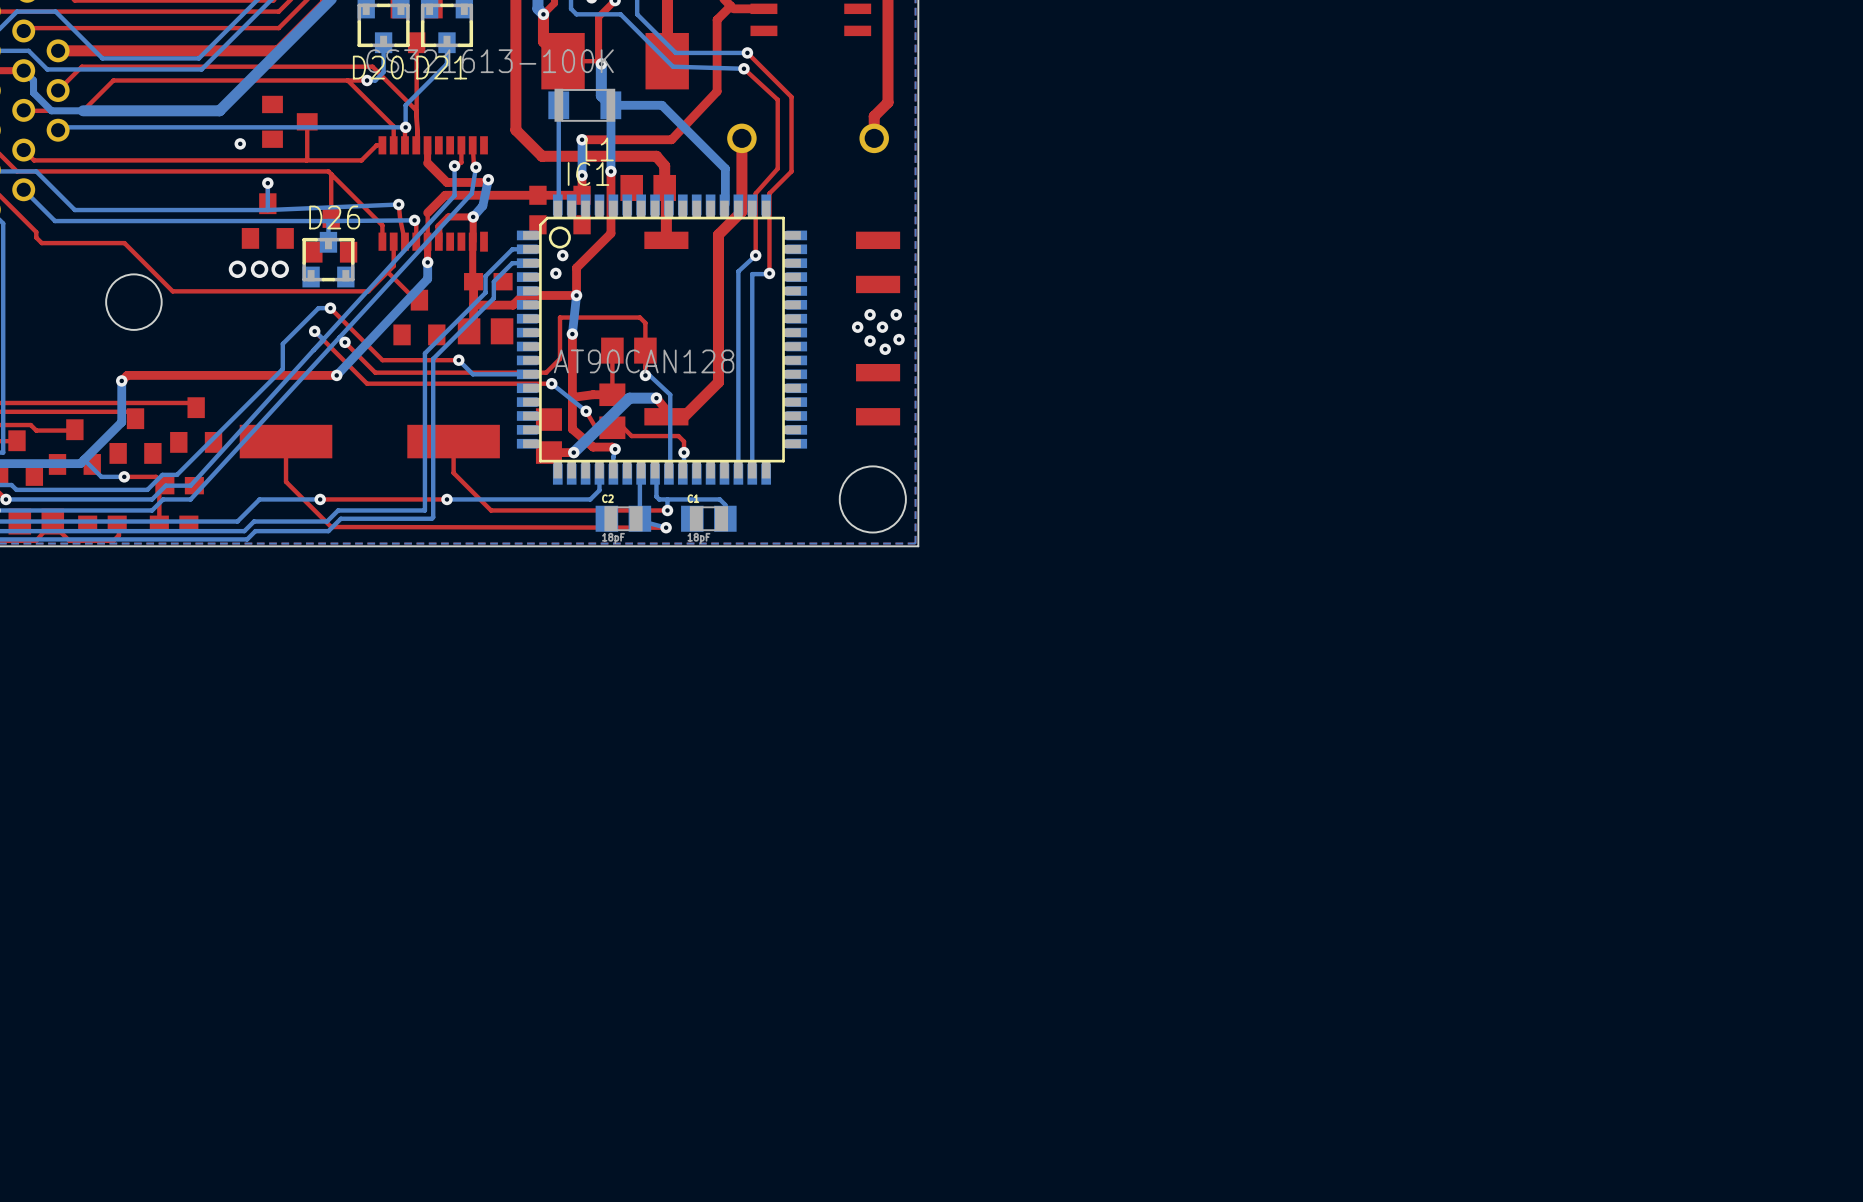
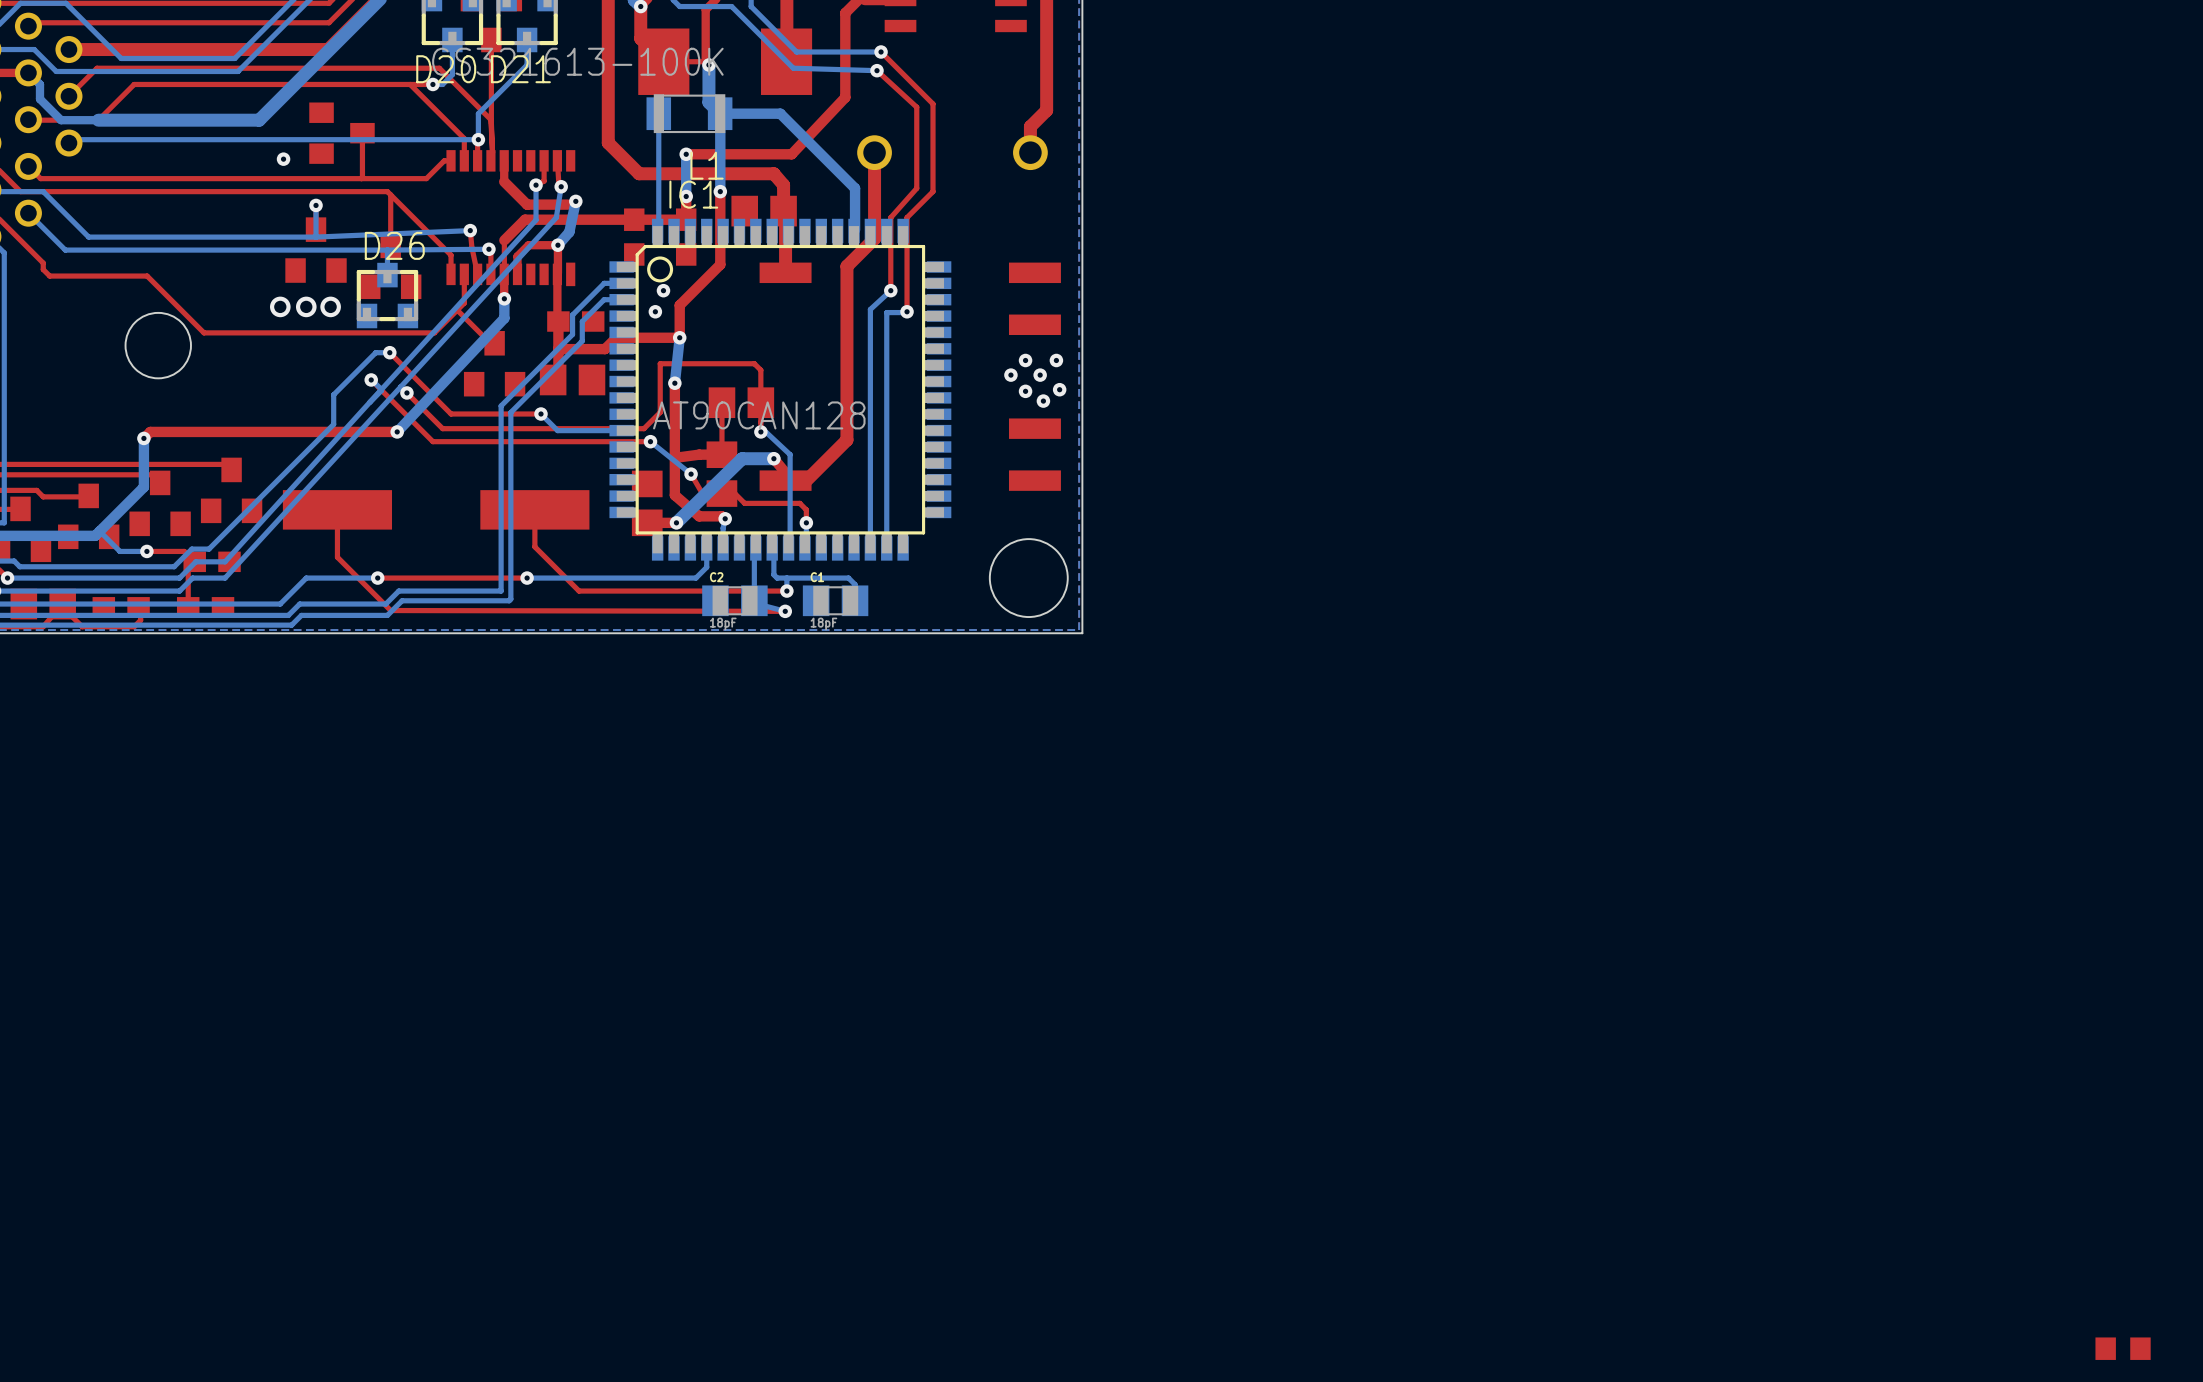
part: none -> (2123, 1348)

